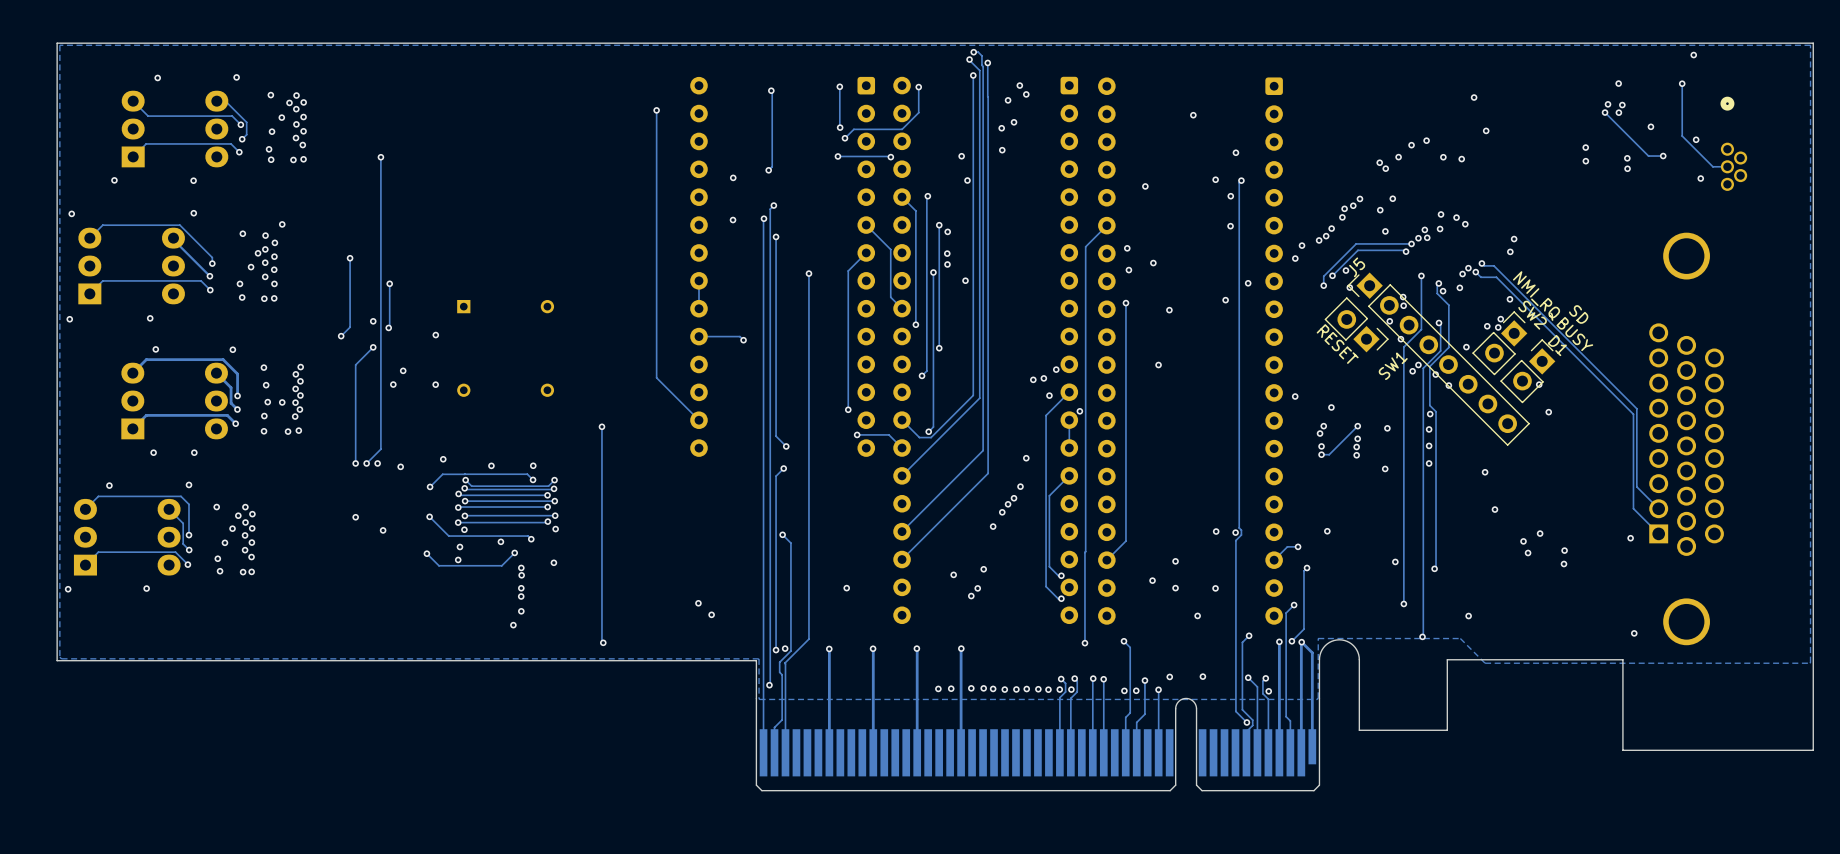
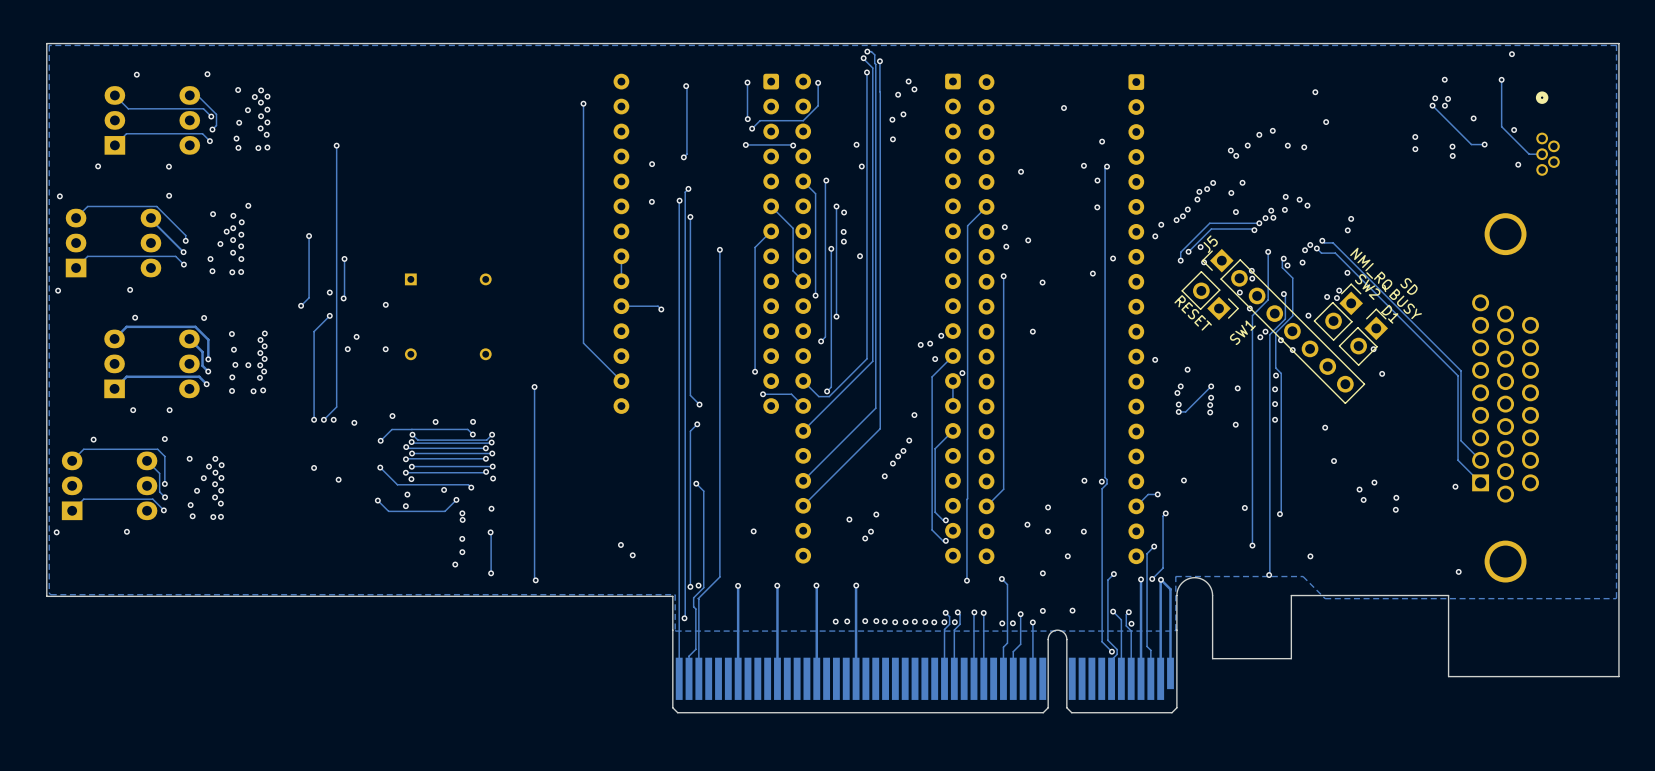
via: (521, 588) -> none
track: none -> (490, 532) (491, 573)
via: none -> (490, 532)
via: none -> (491, 573)
via: none -> (1042, 573)

